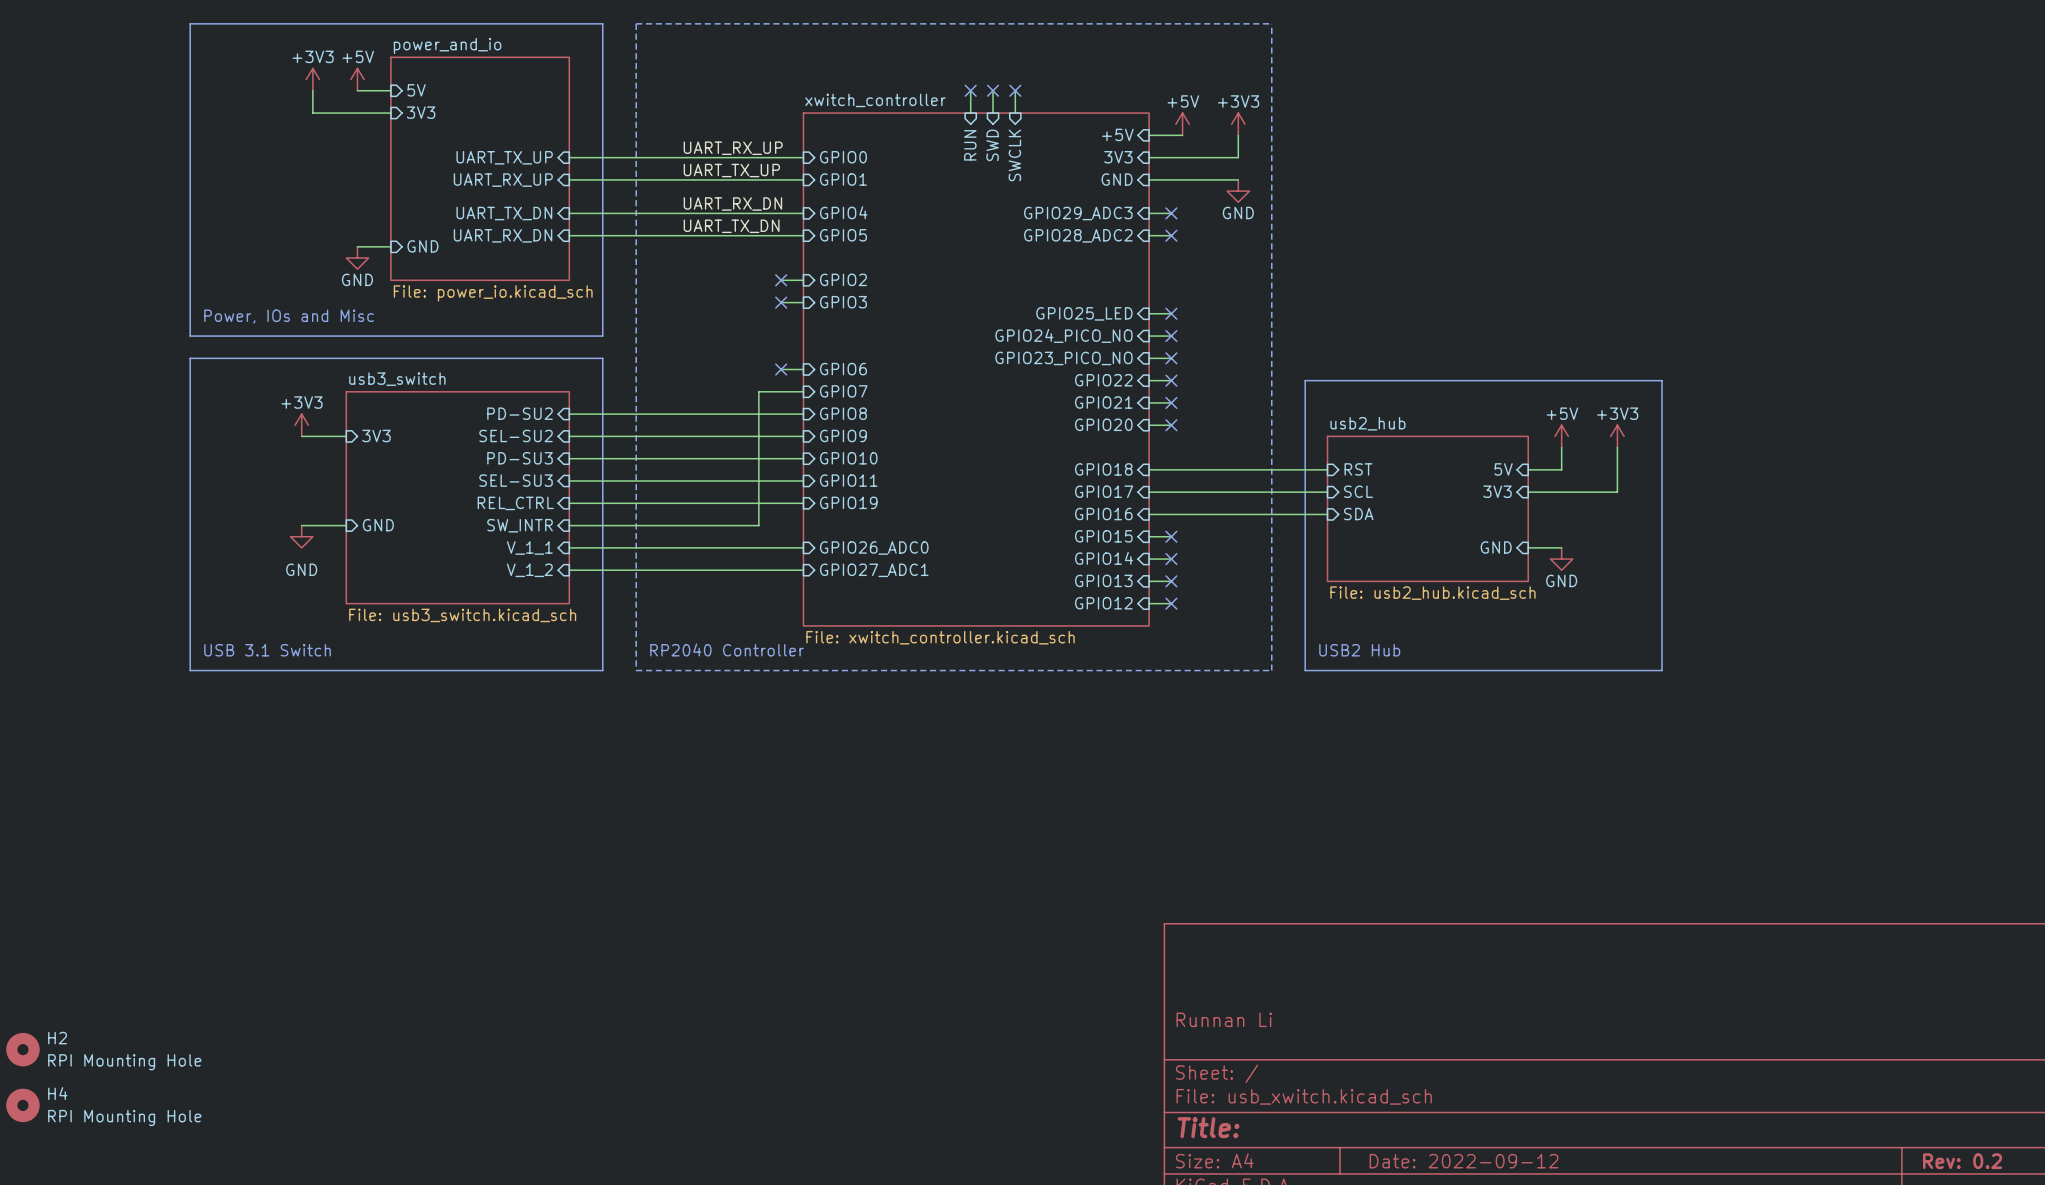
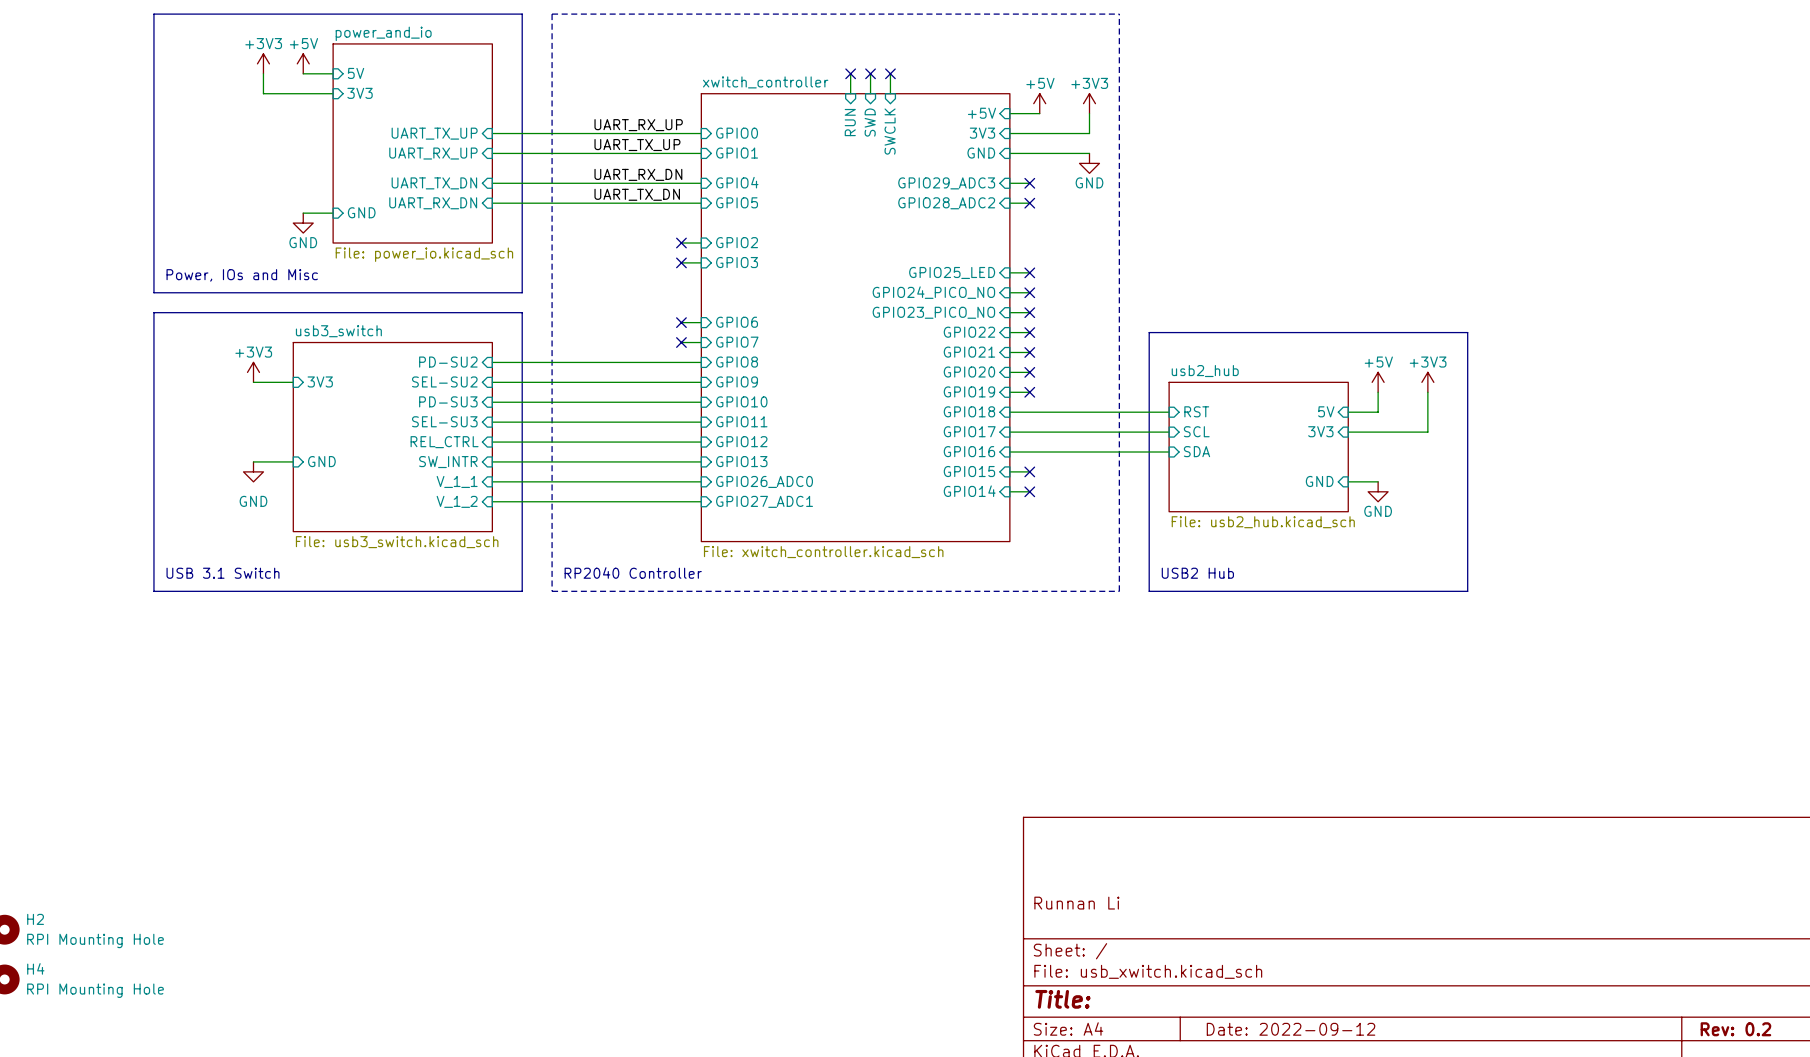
sheet xwitch_controller shape: [802, 112, 1150, 627] -> [700, 93, 1011, 543]
wire: (781, 391) (758, 391) (758, 525) -> (701, 461) (661, 461)
no-connect mark: none -> (681, 342)
sheet pin: none -> GPIO19 (969, 391)
no-connect mark: none -> (1029, 392)
sheet pin: GPIO19 (848, 502) -> GPIO12 (741, 441)
sheet pin: none -> GPIO13 (741, 461)
sheet pin: GPIO13 (1103, 580) -> none
wire: (1149, 581) (1171, 581) -> (1009, 392) (1029, 392)
no-connect mark: (1171, 581) -> none
sheet pin: GPIO12 (1103, 603) -> none
wire: (1149, 603) (1171, 603) -> none
no-connect mark: (1171, 603) -> none

